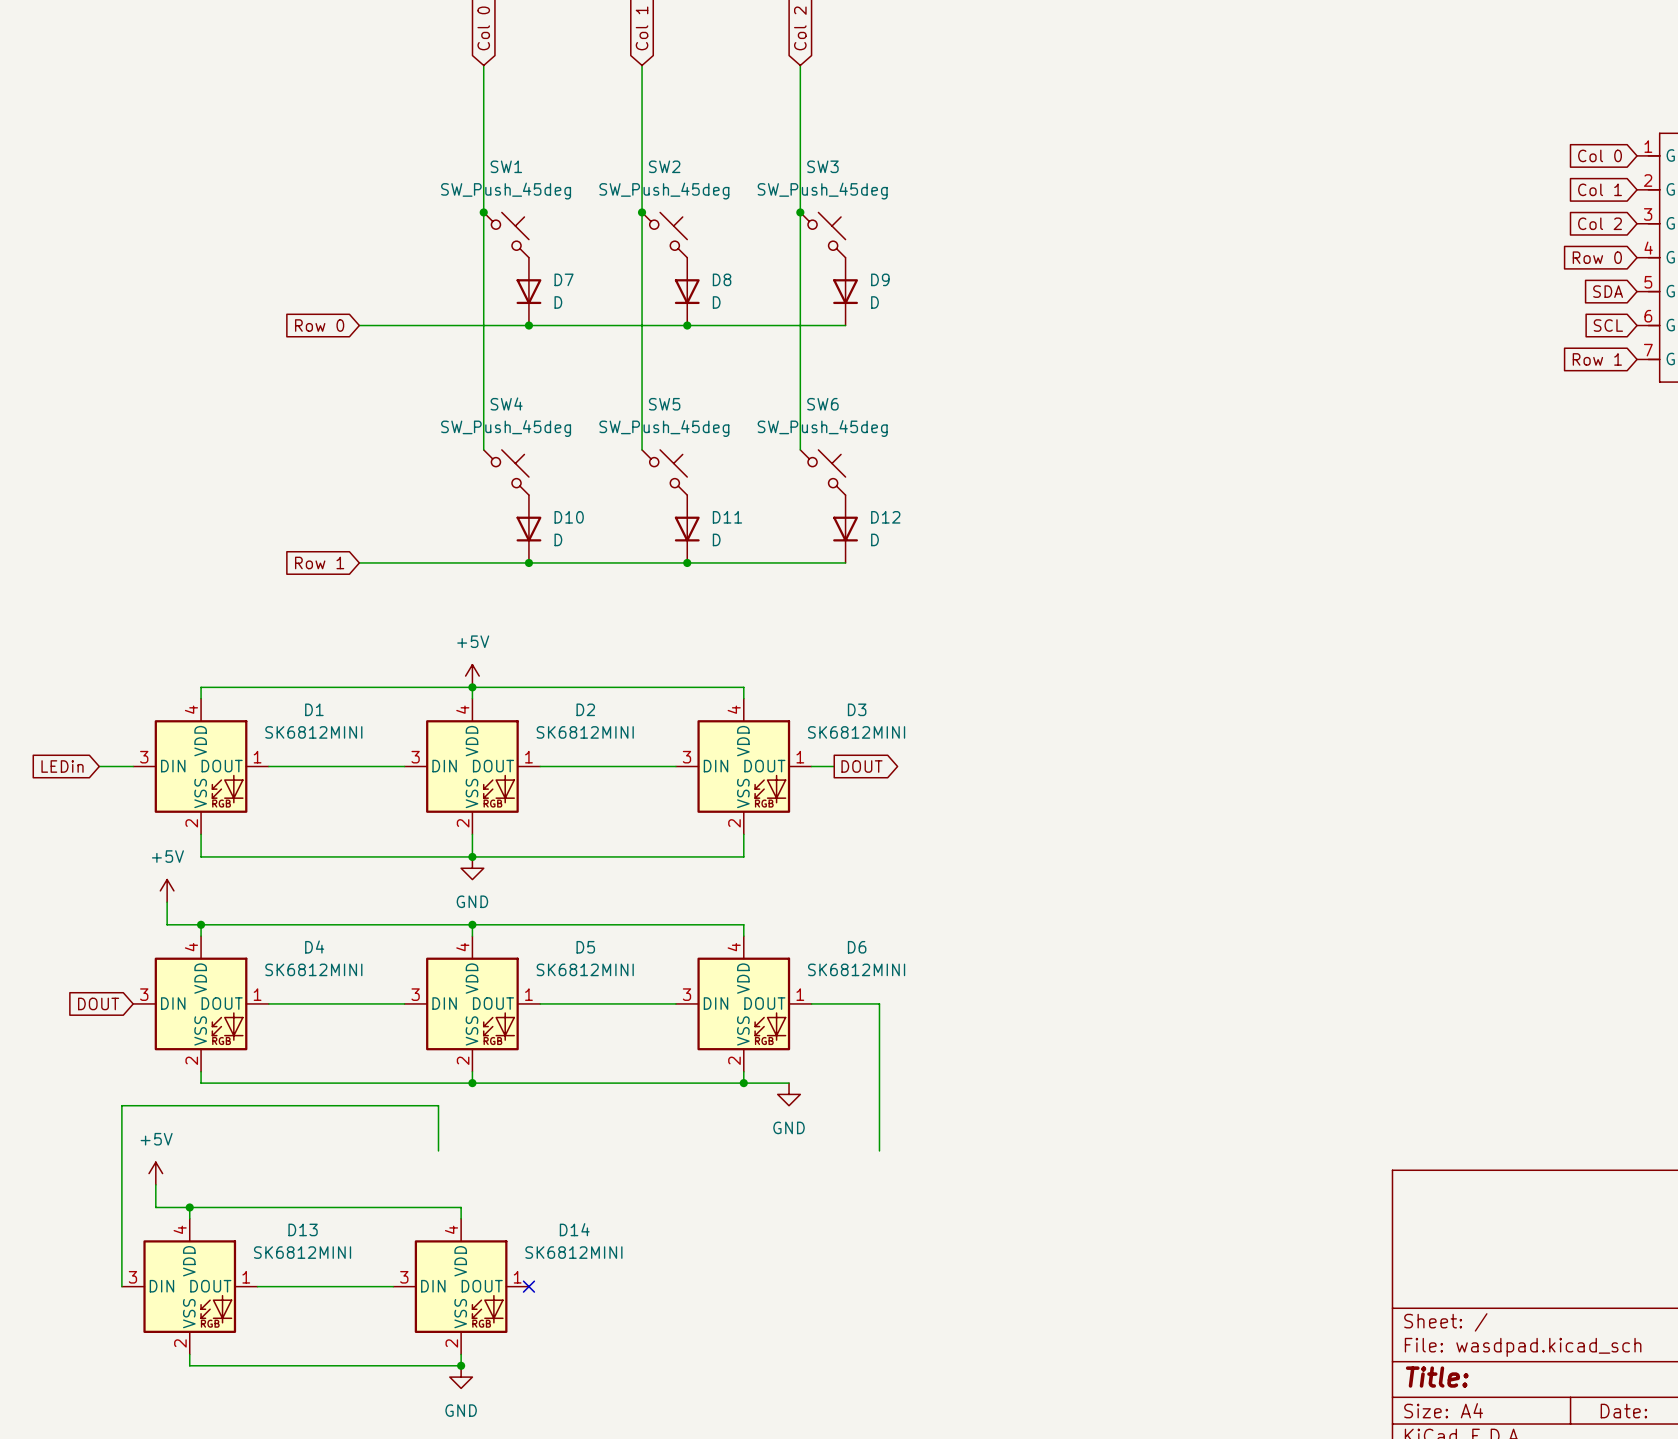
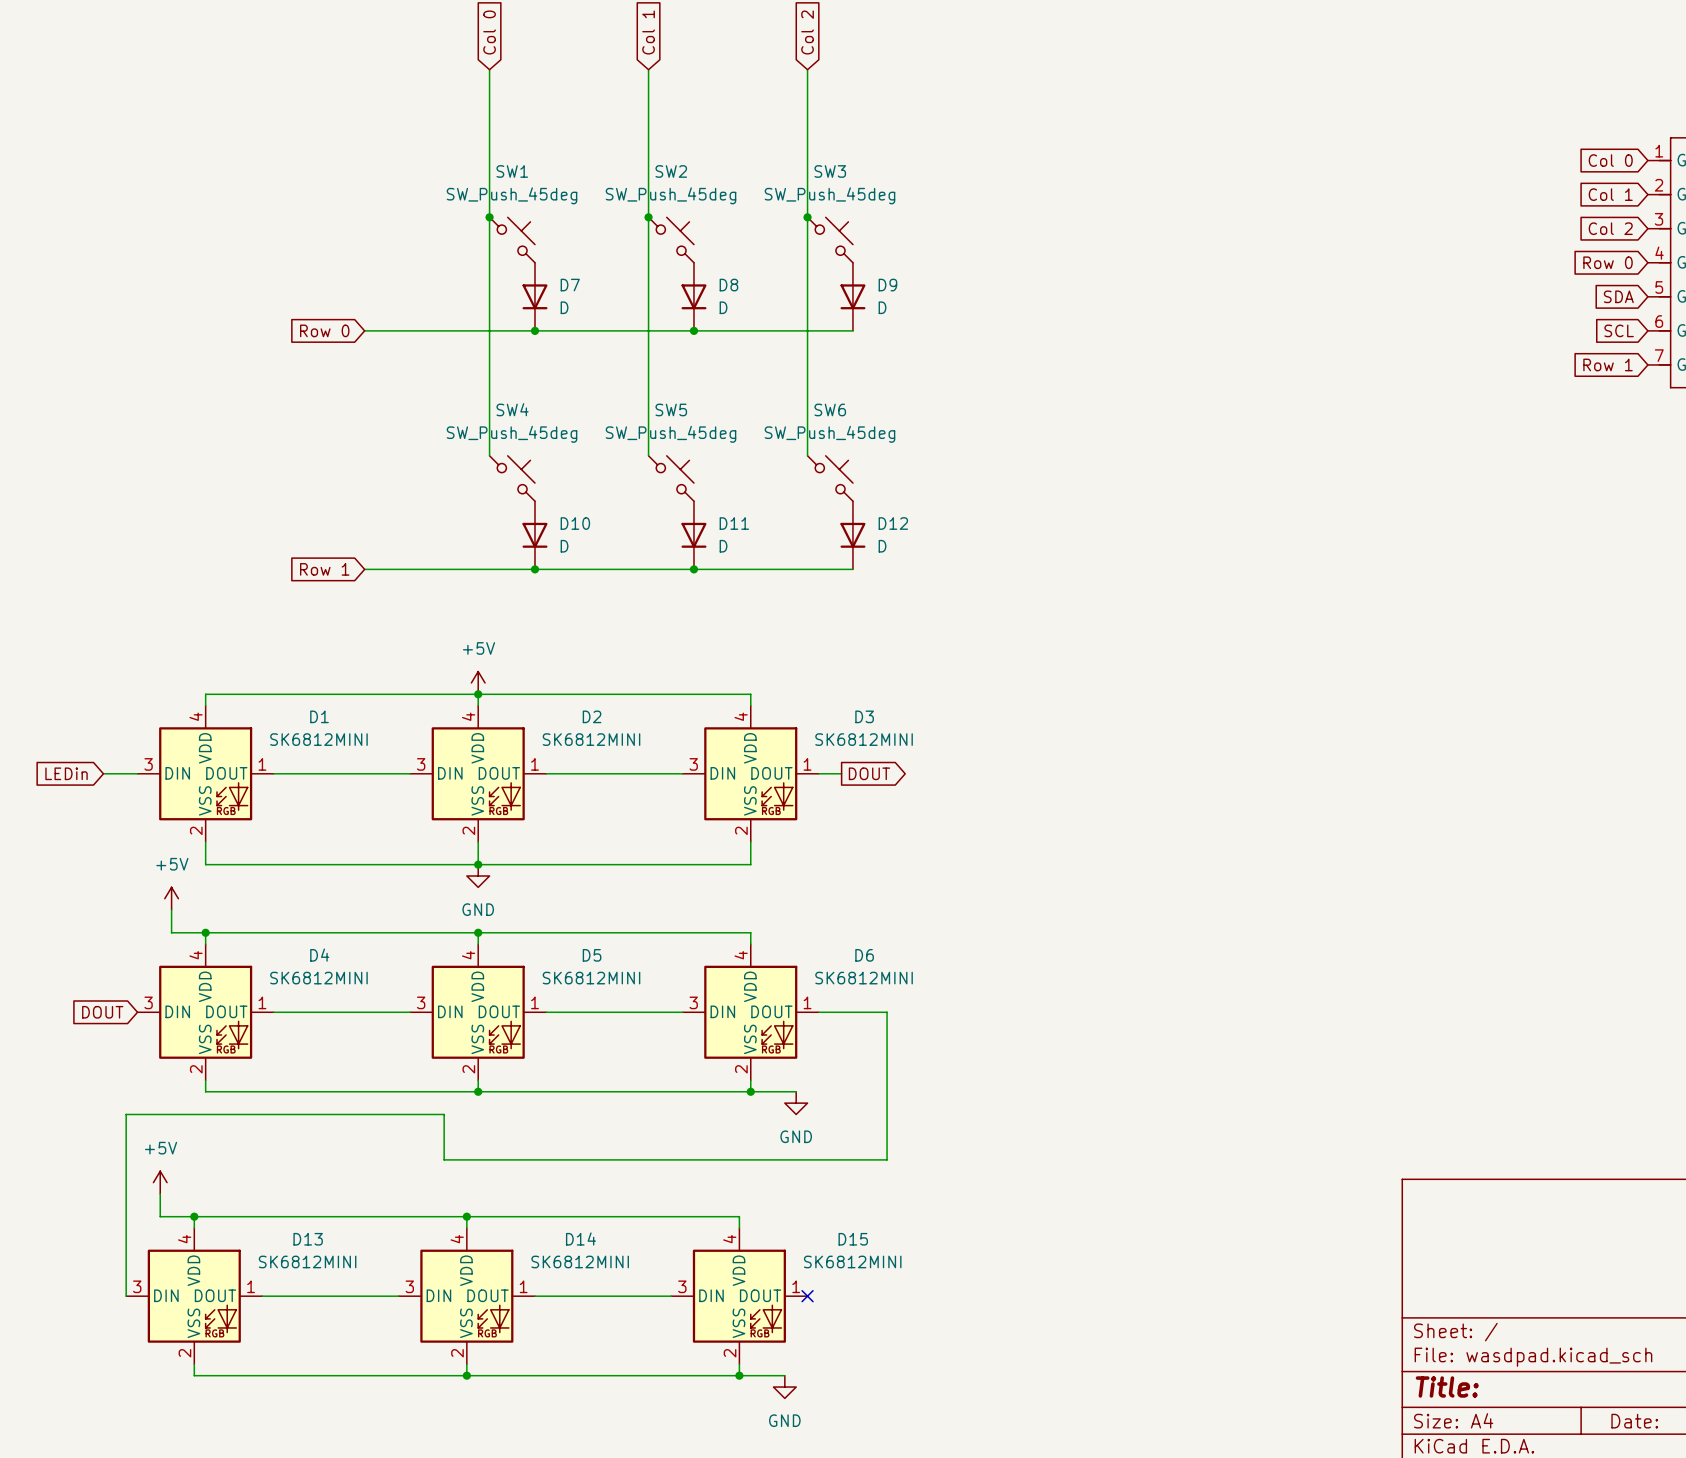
wire: none -> (444, 1159) (887, 1159)
wire: none -> (466, 1216) (739, 1216) (739, 1228)
junction: none -> (466, 1216)
wire: none -> (534, 1296) (671, 1296)
no-connect mark: (528, 1286) -> none
D15: none -> SK6812MINI (739, 1296)
no-connect mark: none -> (807, 1296)
wire: none -> (739, 1364) (739, 1375)
wire: none -> (466, 1375) (784, 1375)
junction: none -> (739, 1375)
power symbol: GND (461, 1377) -> none
power symbol: none -> GND (784, 1387)

